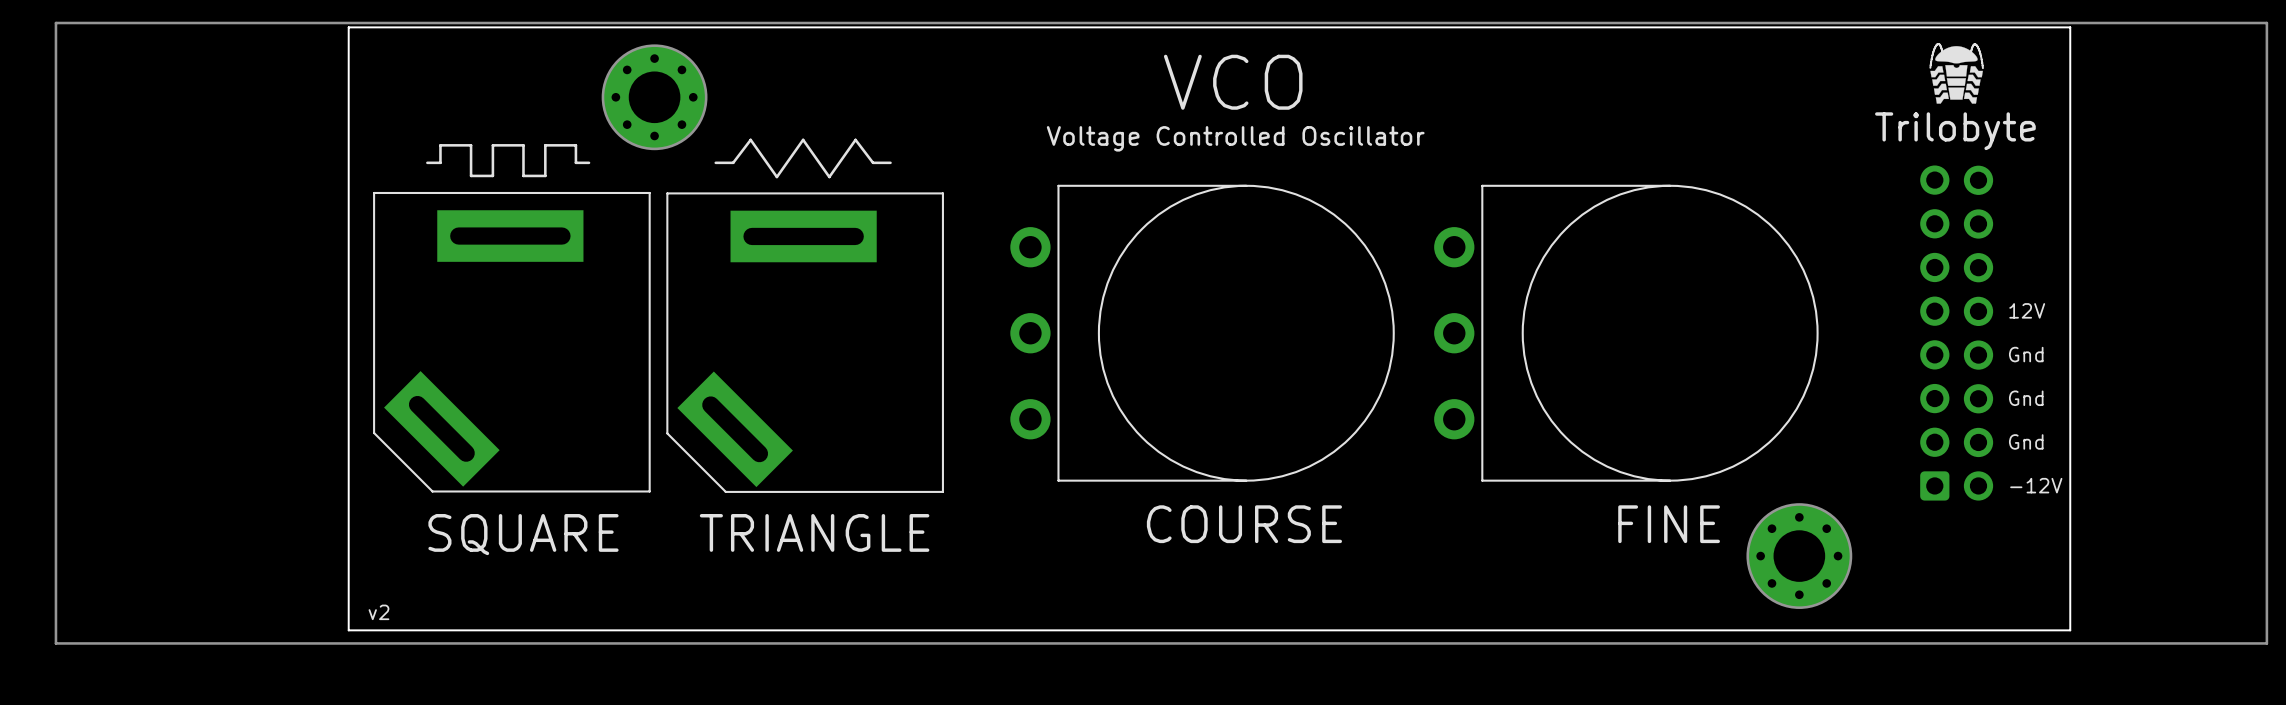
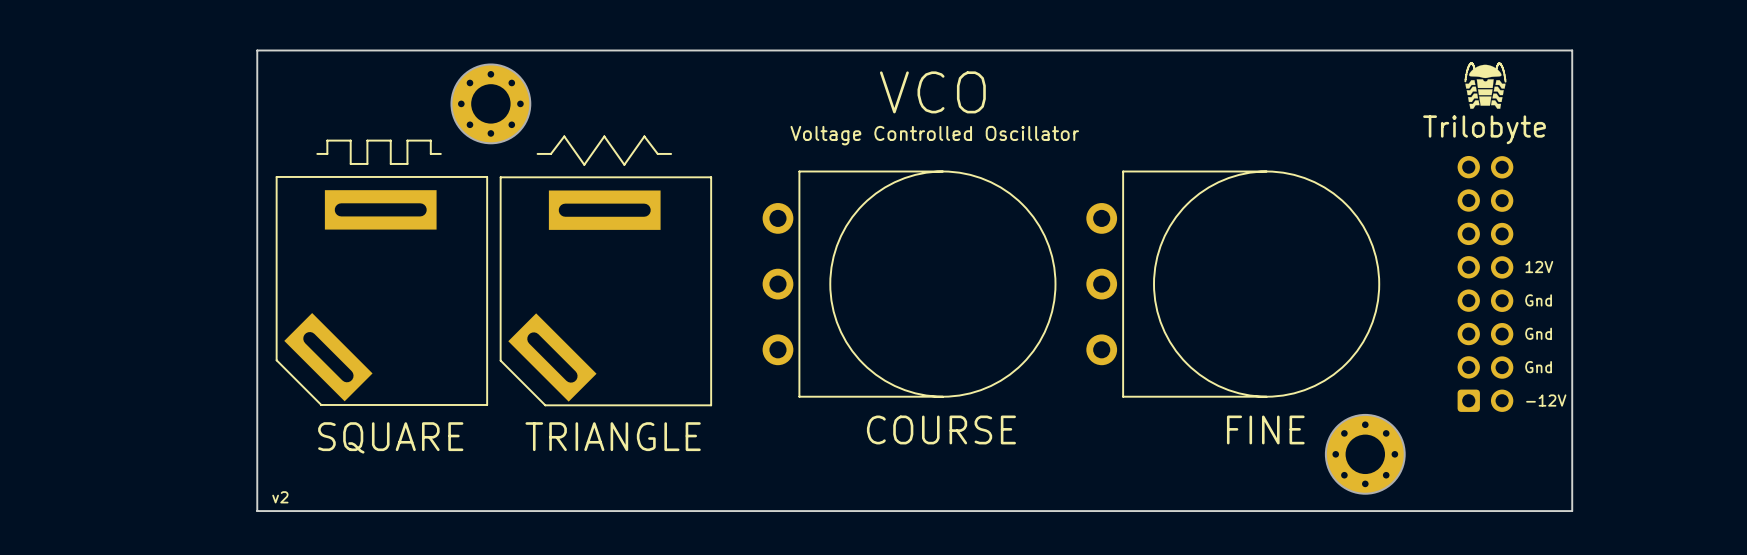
line: (55, 23) (2266, 23) (2266, 643) (55, 643) (55, 23) -> none

